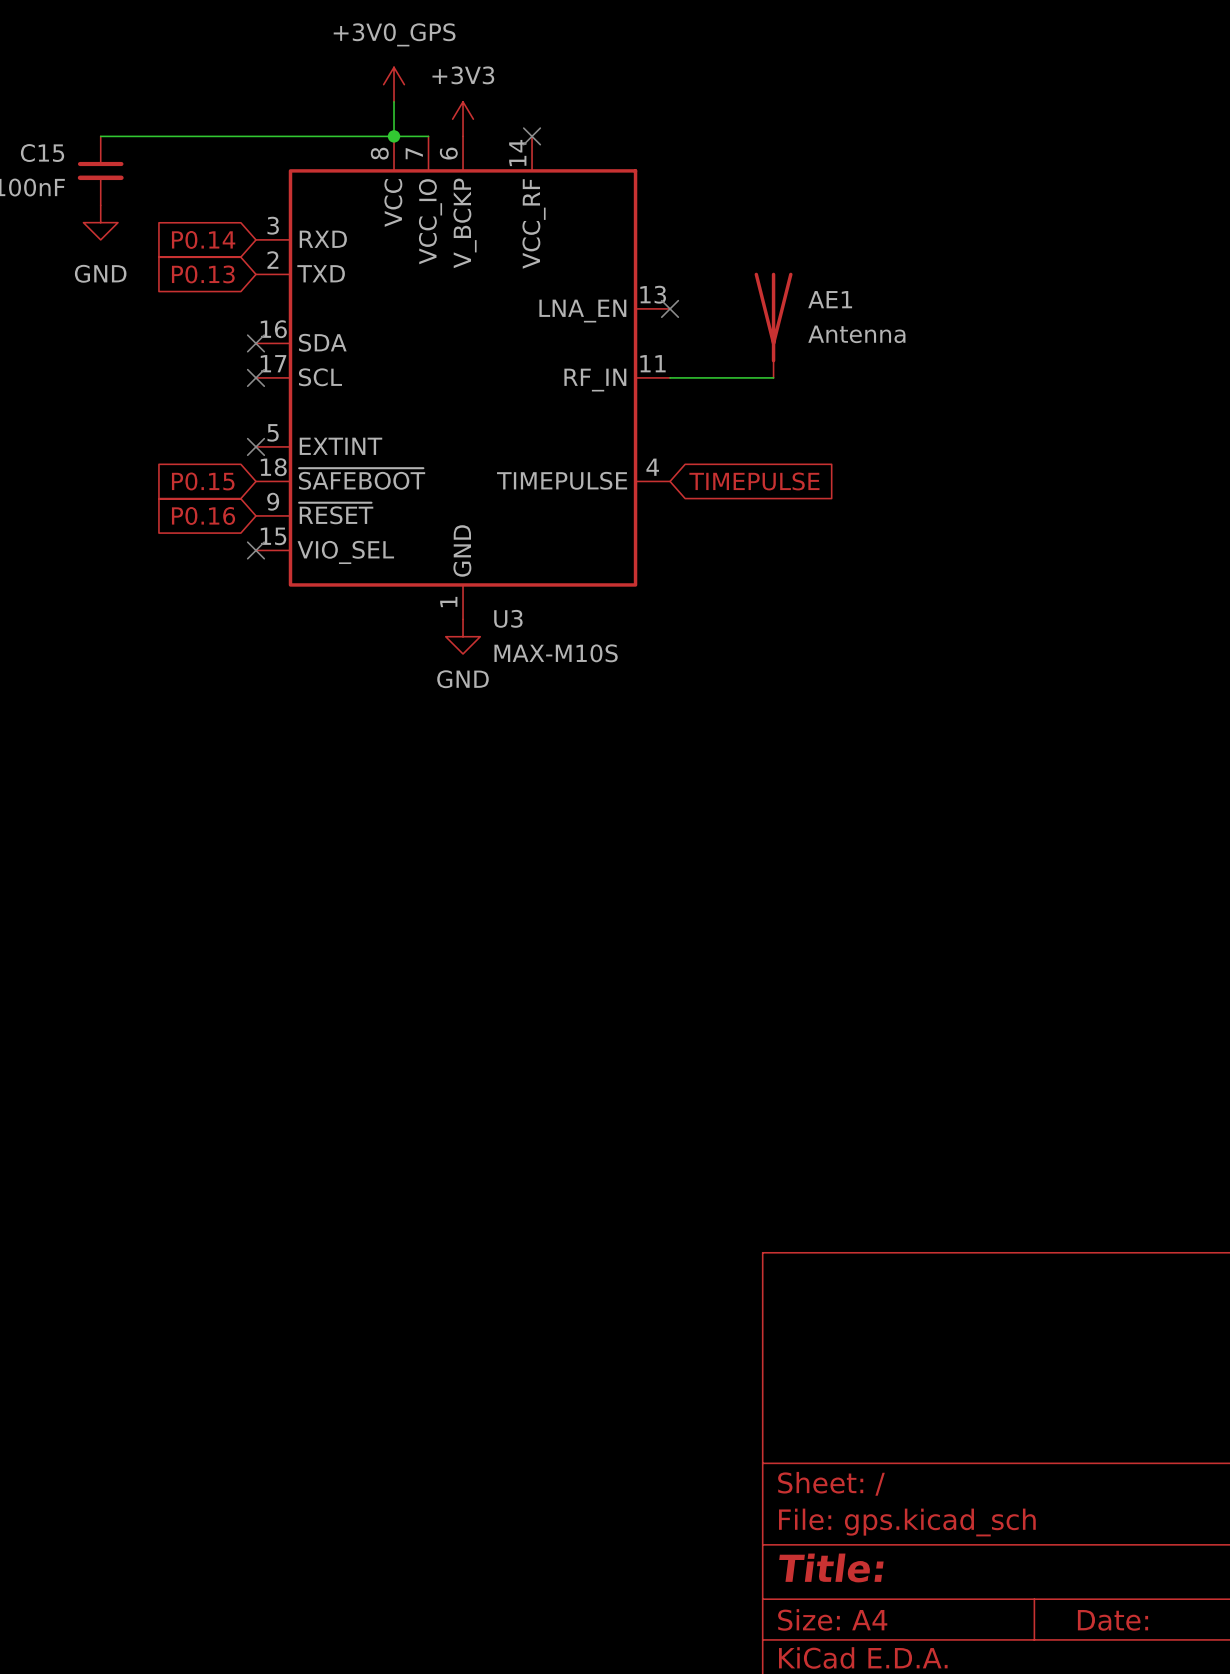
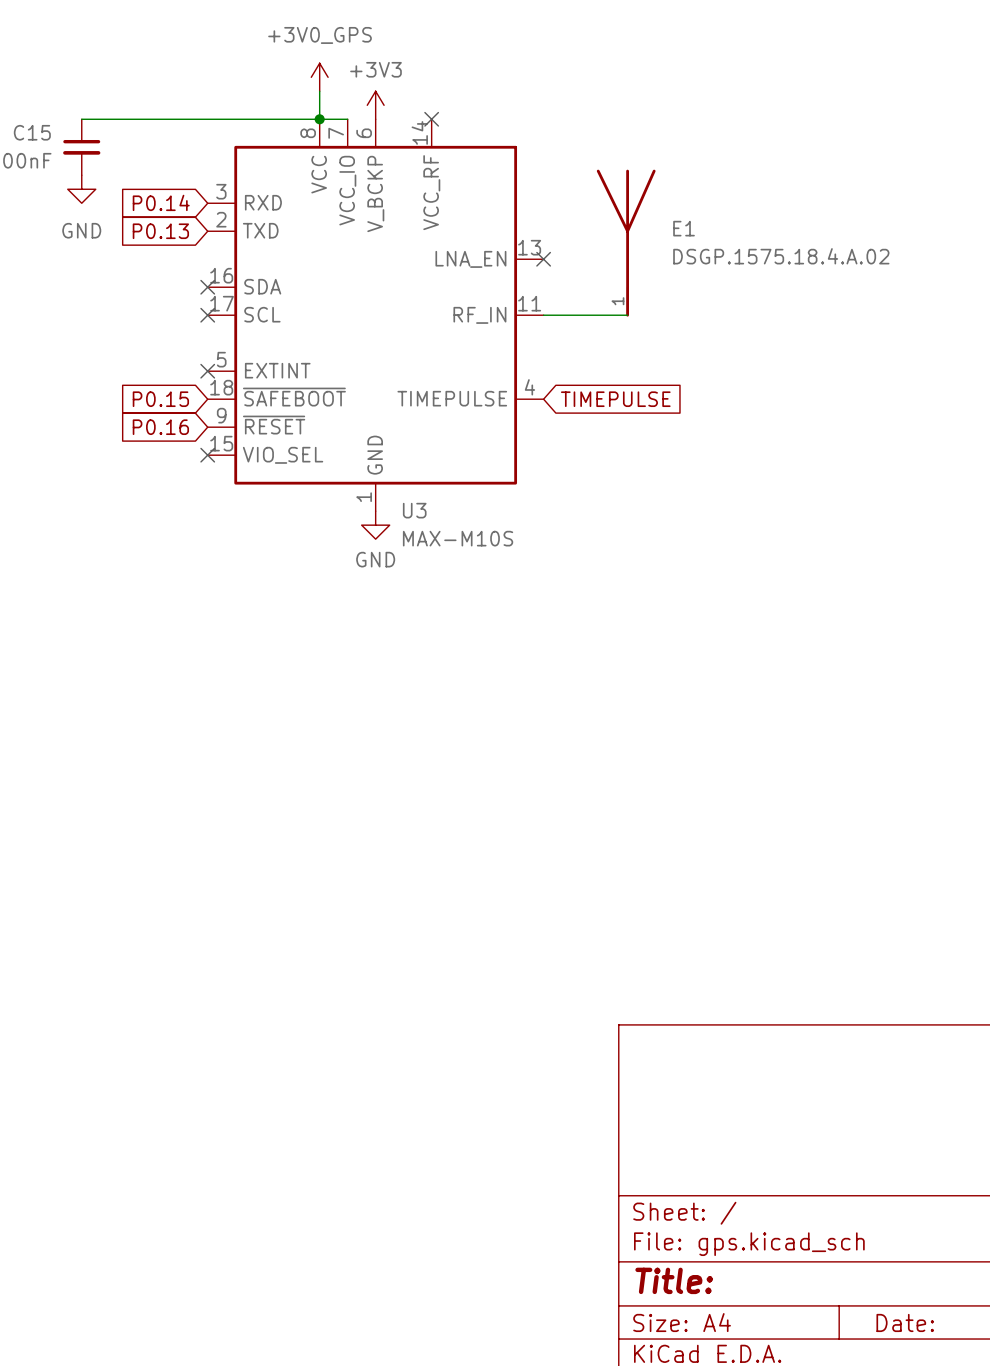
E1: none -> DSGP.1575.18.4.A.02 (626, 243)
AE1: Antenna (773, 325) -> none

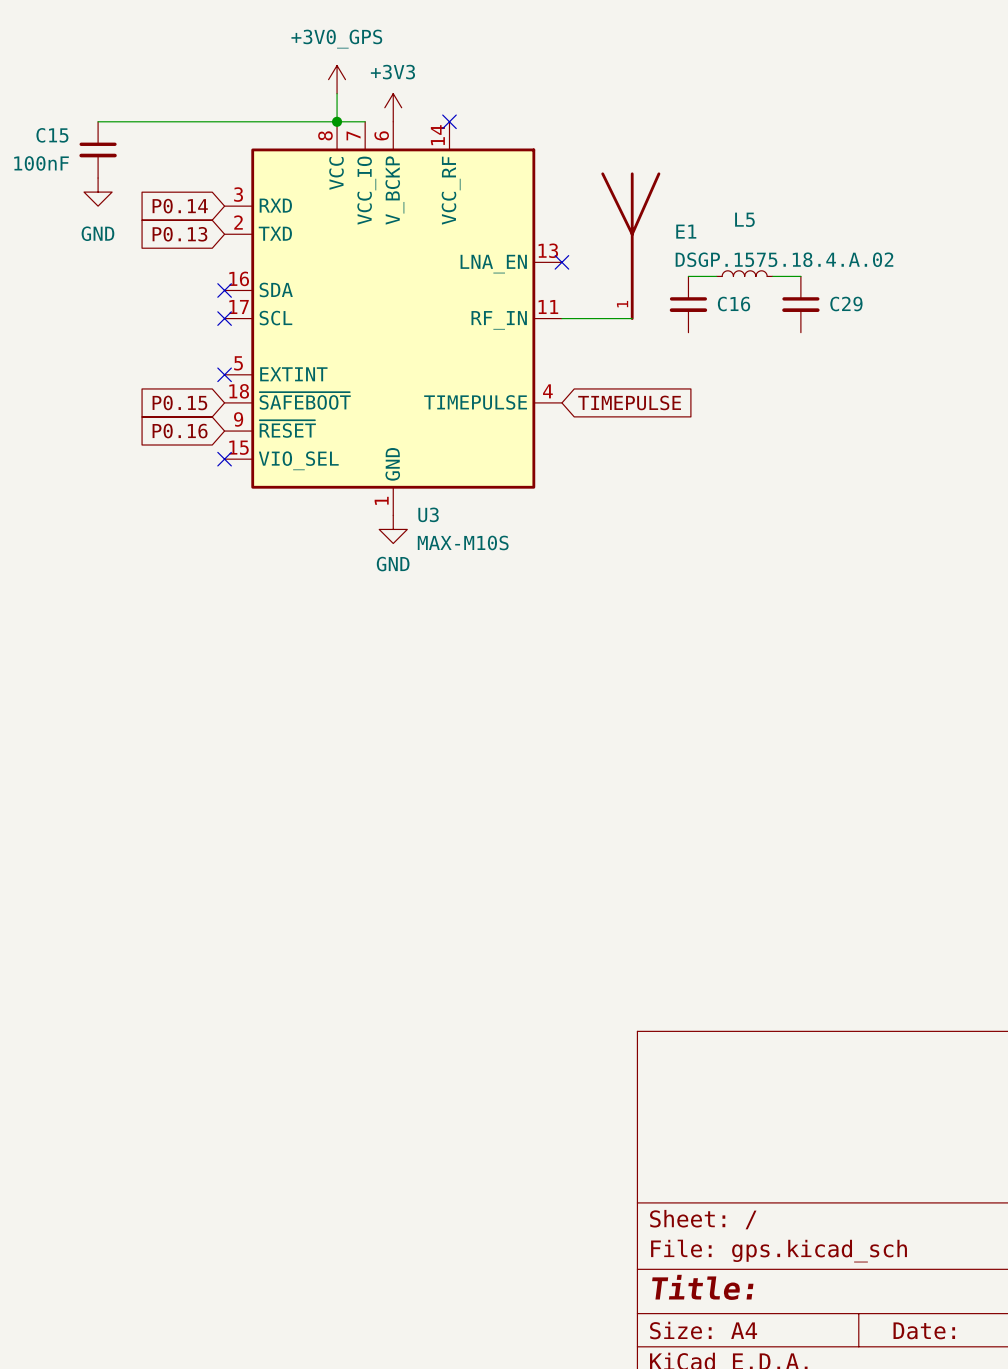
E1 position: (626, 243) -> (630, 246)
L5: none -> (744, 273)
wire: none -> (688, 276) (716, 276)
wire: none -> (772, 276) (800, 276)
C16: none -> (688, 304)
C29: none -> (800, 304)
wire: (613, 315) (627, 315) -> none

